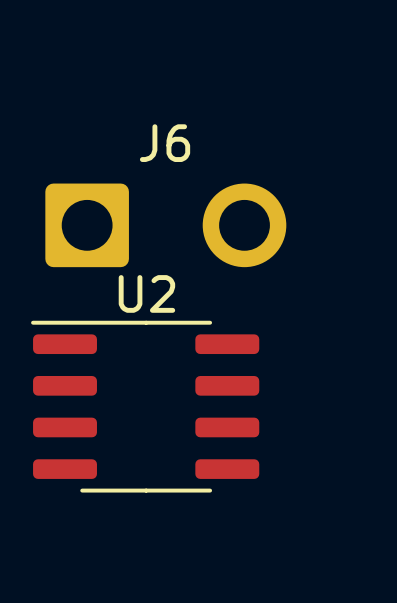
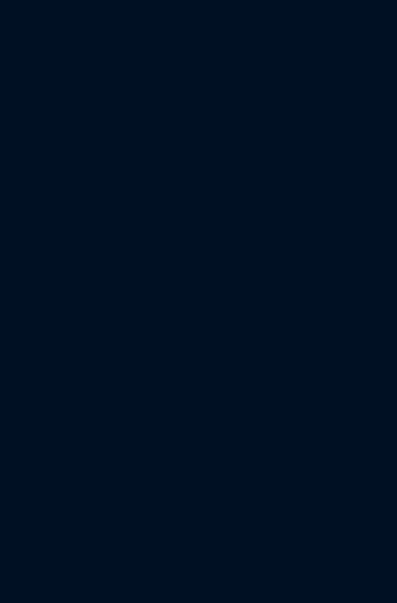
J6: (165, 225) -> none
U2: (145, 406) -> none

